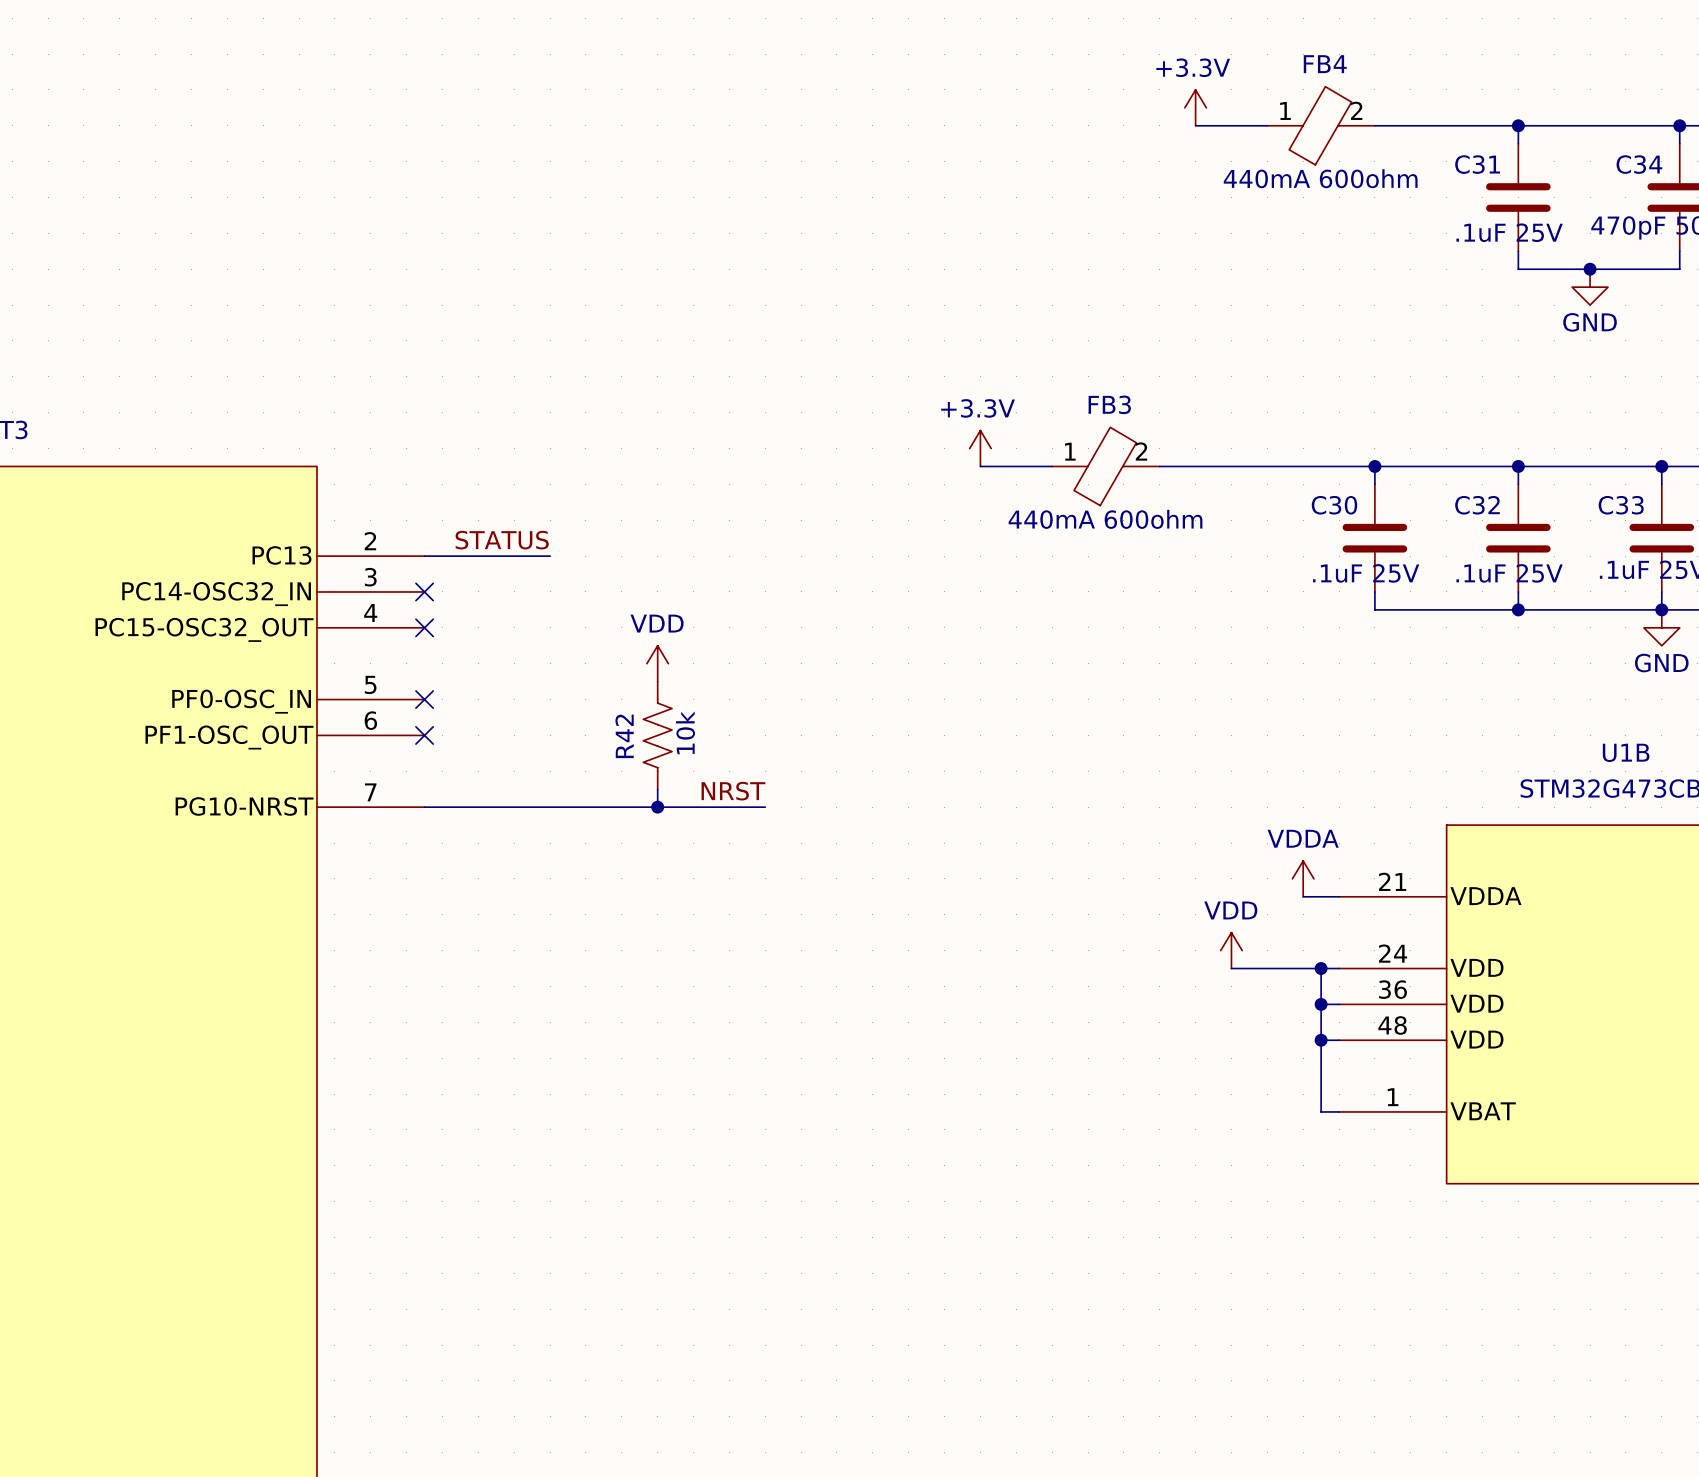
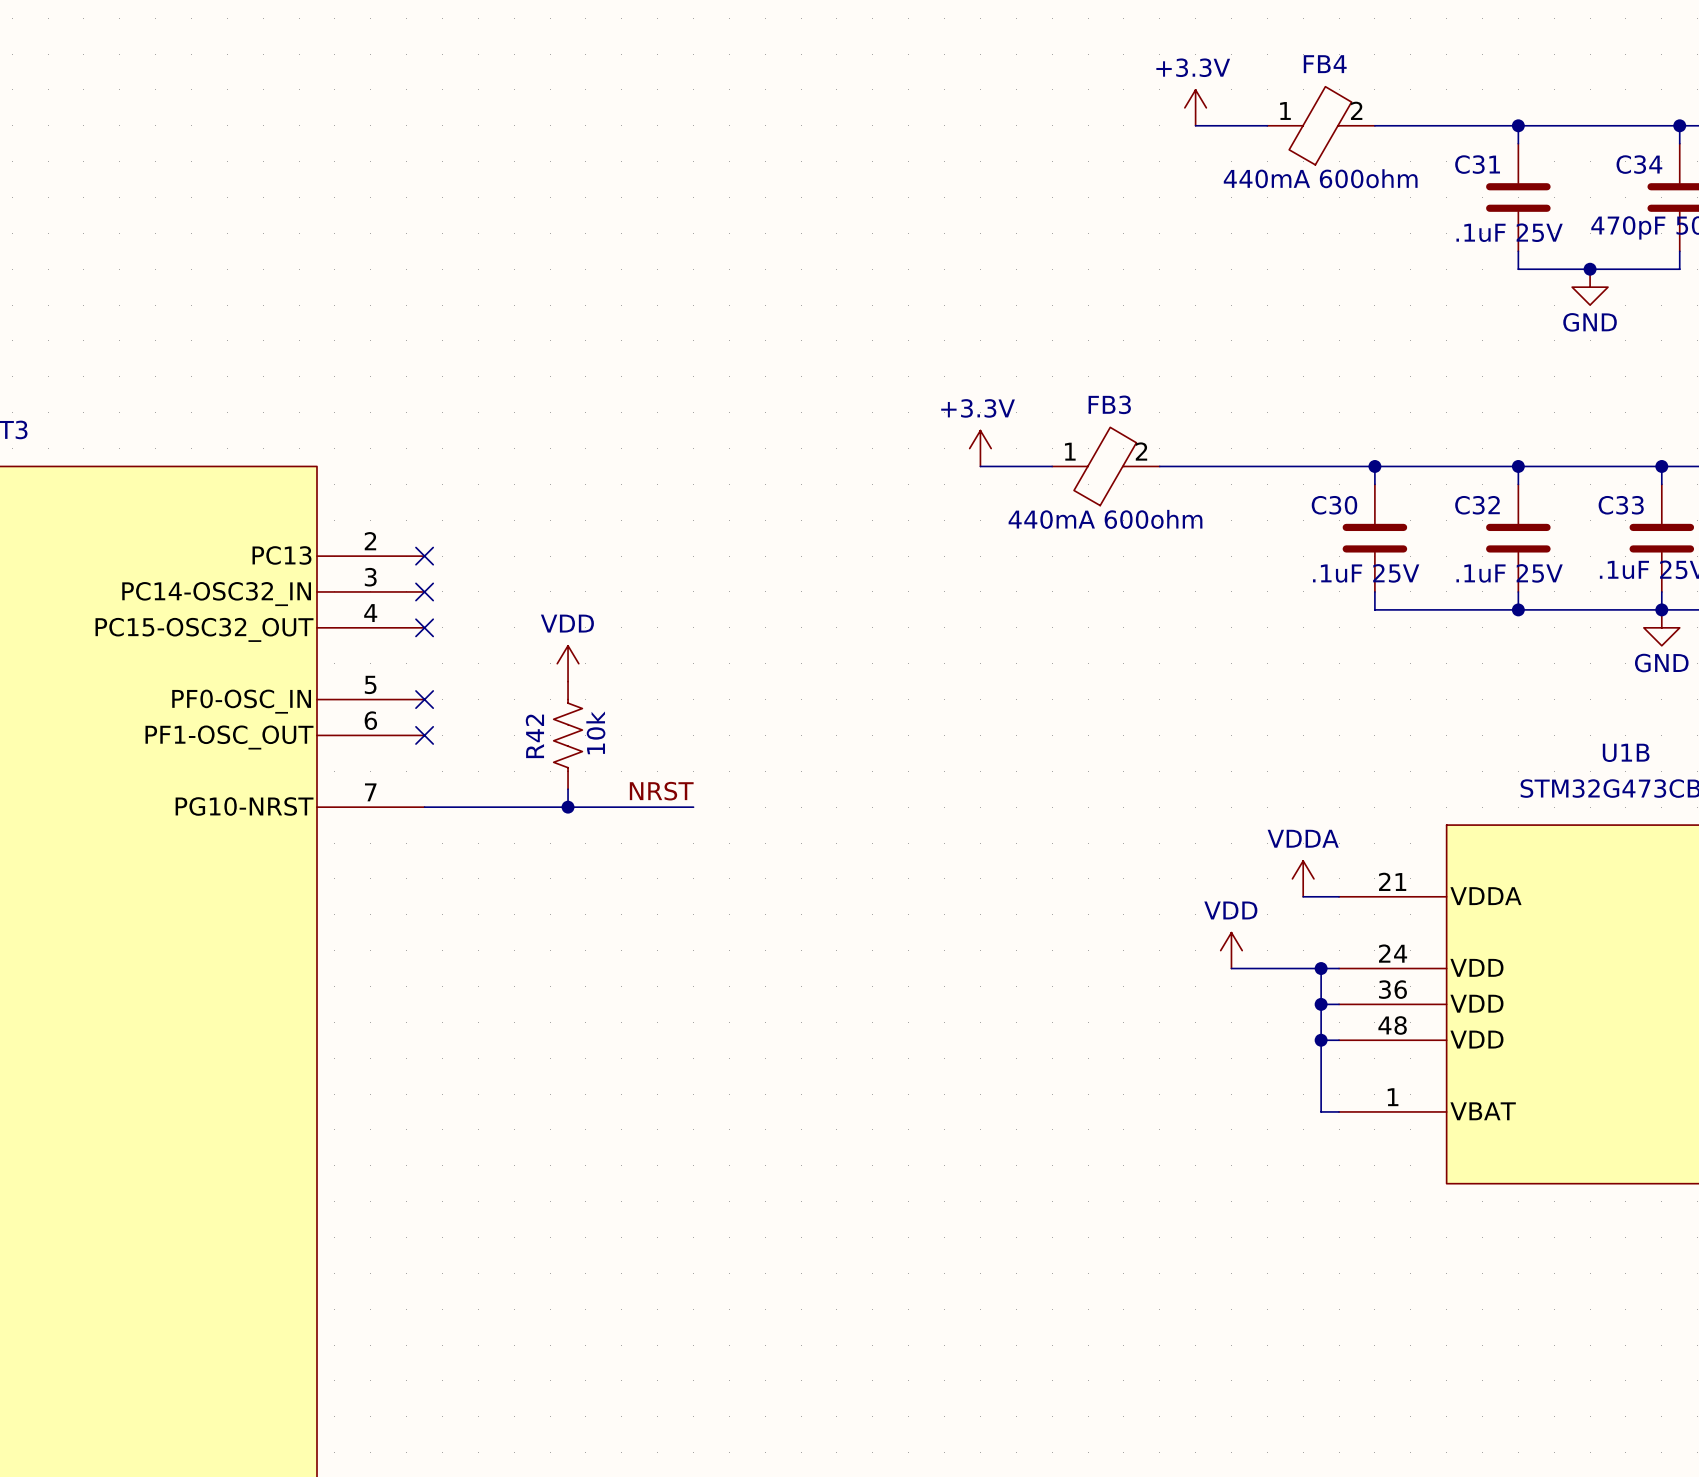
label: STATUS (502, 540) -> none
wire: (424, 556) (550, 556) -> none
no-connect mark: none -> (424, 556)
power symbol position: VDD (657, 663) -> VDD (568, 663)
R42 position: (657, 735) -> (568, 735)
wire: (657, 789) (657, 807) -> (568, 789) (568, 807)
label position: NRST (733, 791) -> NRST (661, 791)
junction: none -> (568, 807)
junction: (657, 807) -> none
wire: (693, 807) (765, 807) -> none

